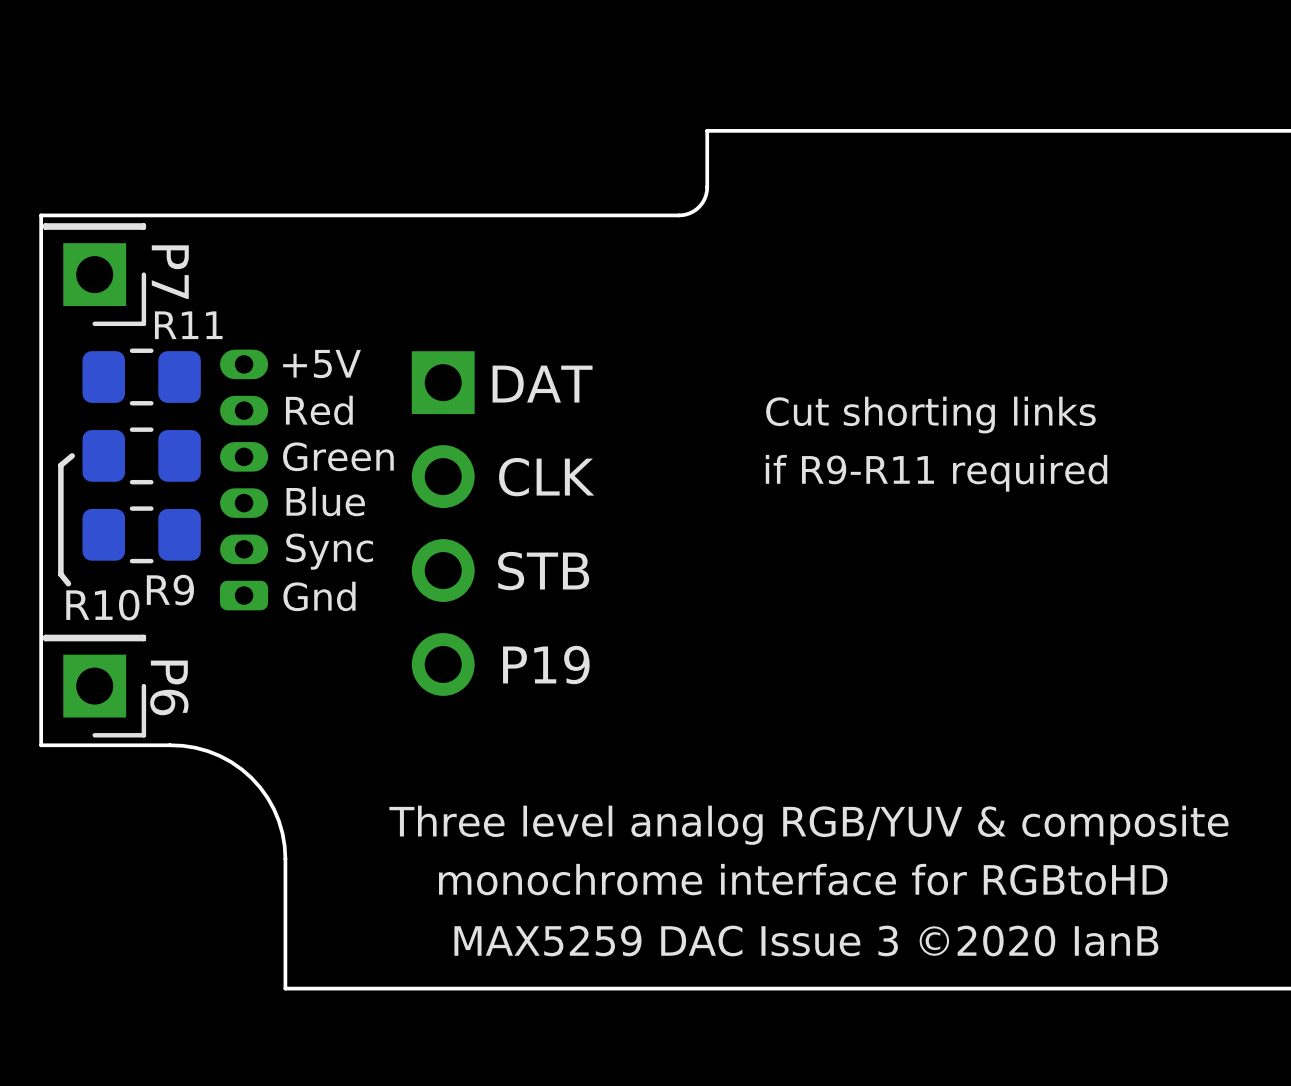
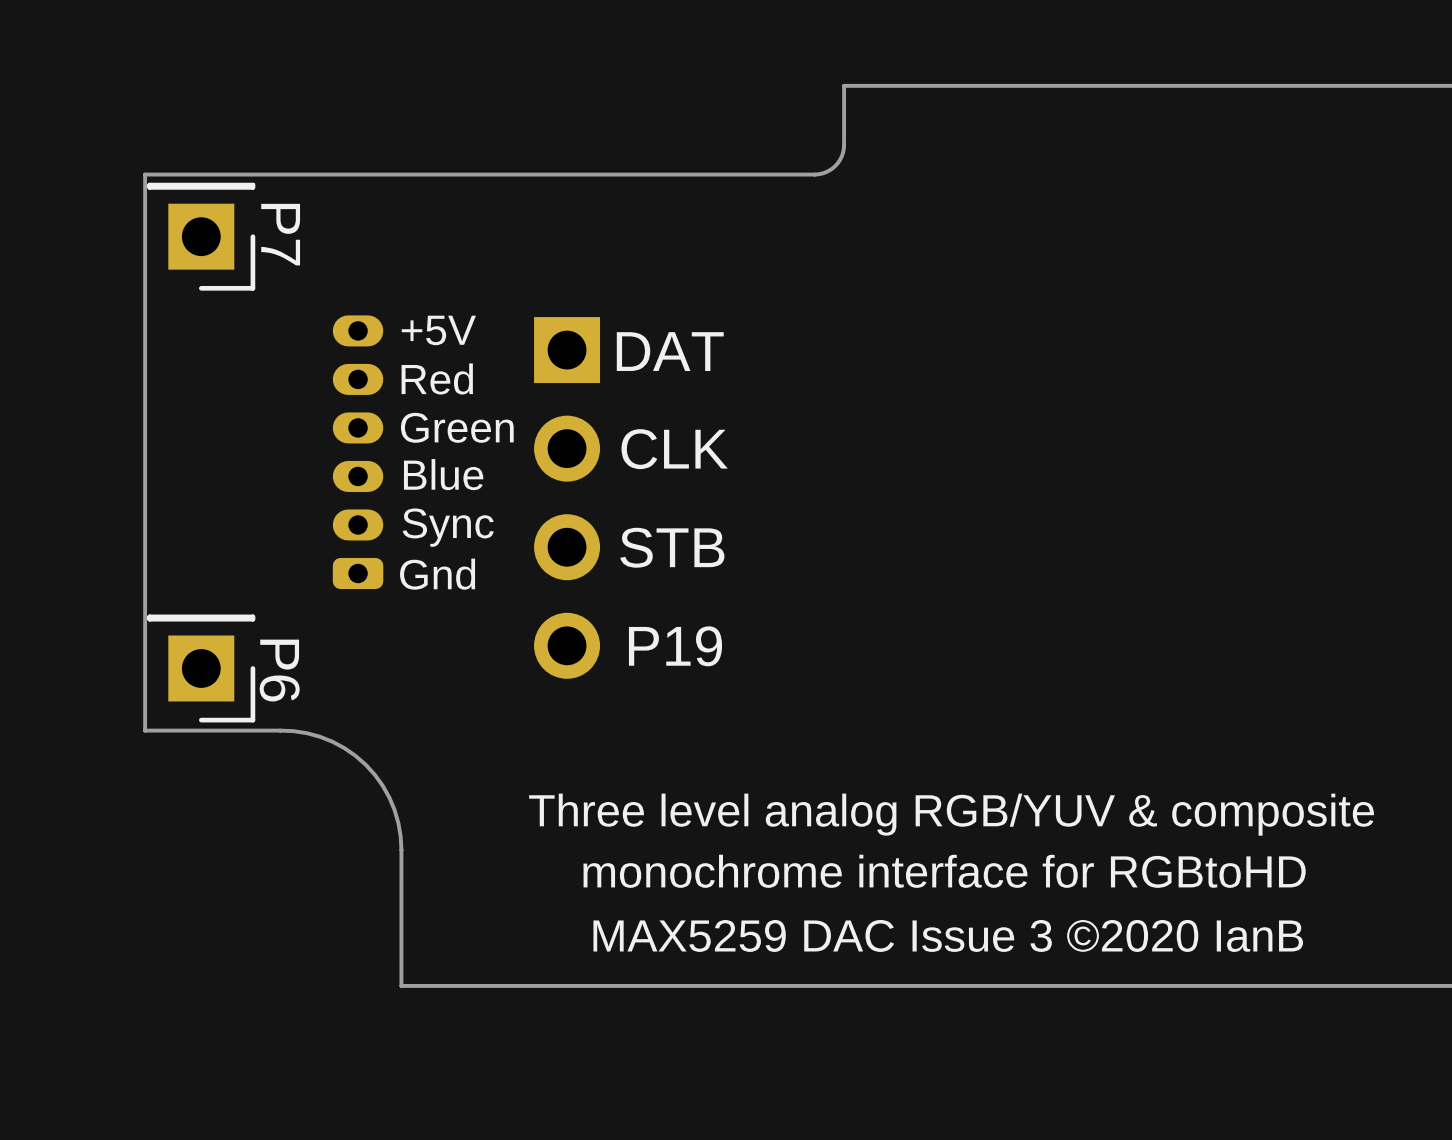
R11: (141, 377) -> none
text: Cut shorting links (930, 415) -> none
line: (72, 455) (60, 465) (60, 574) (68, 583) -> none
R10: (141, 455) -> none
text: if R9-R11 required (936, 473) -> none
R9: (141, 534) -> none

